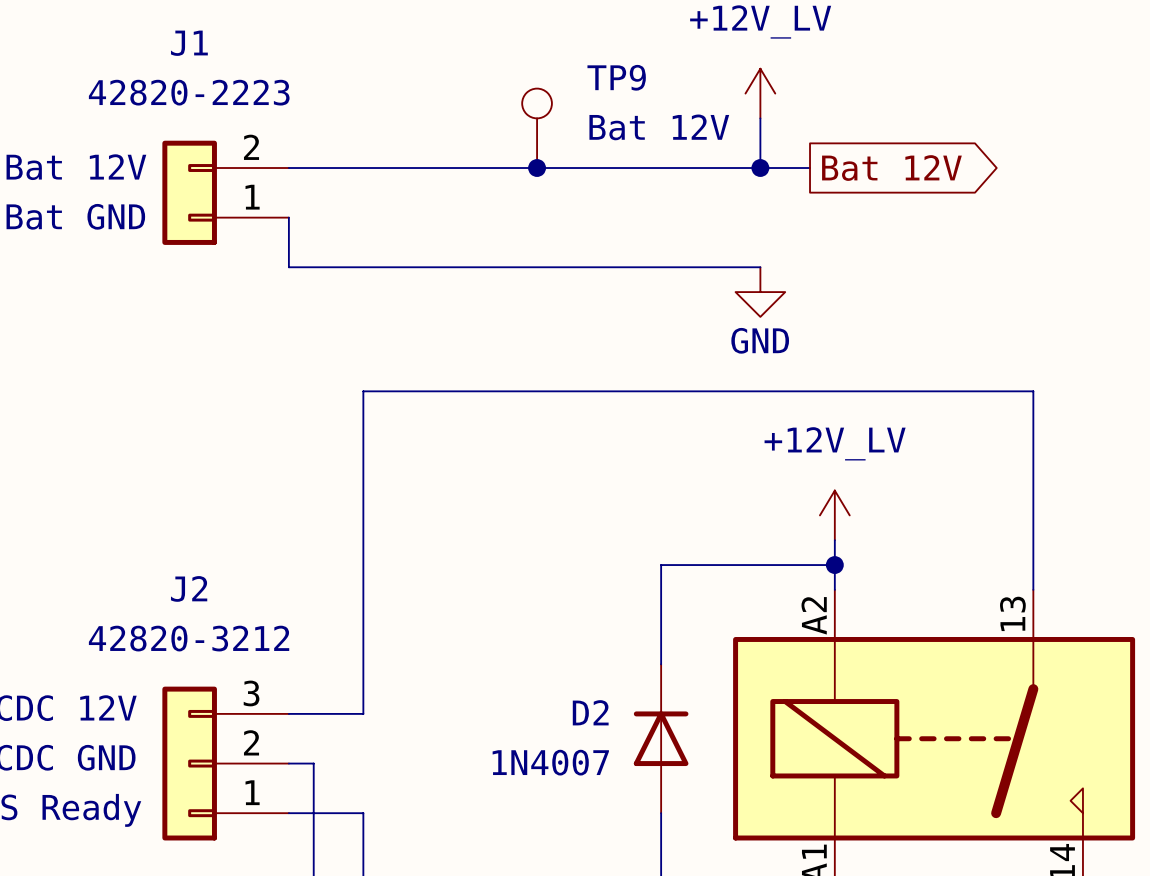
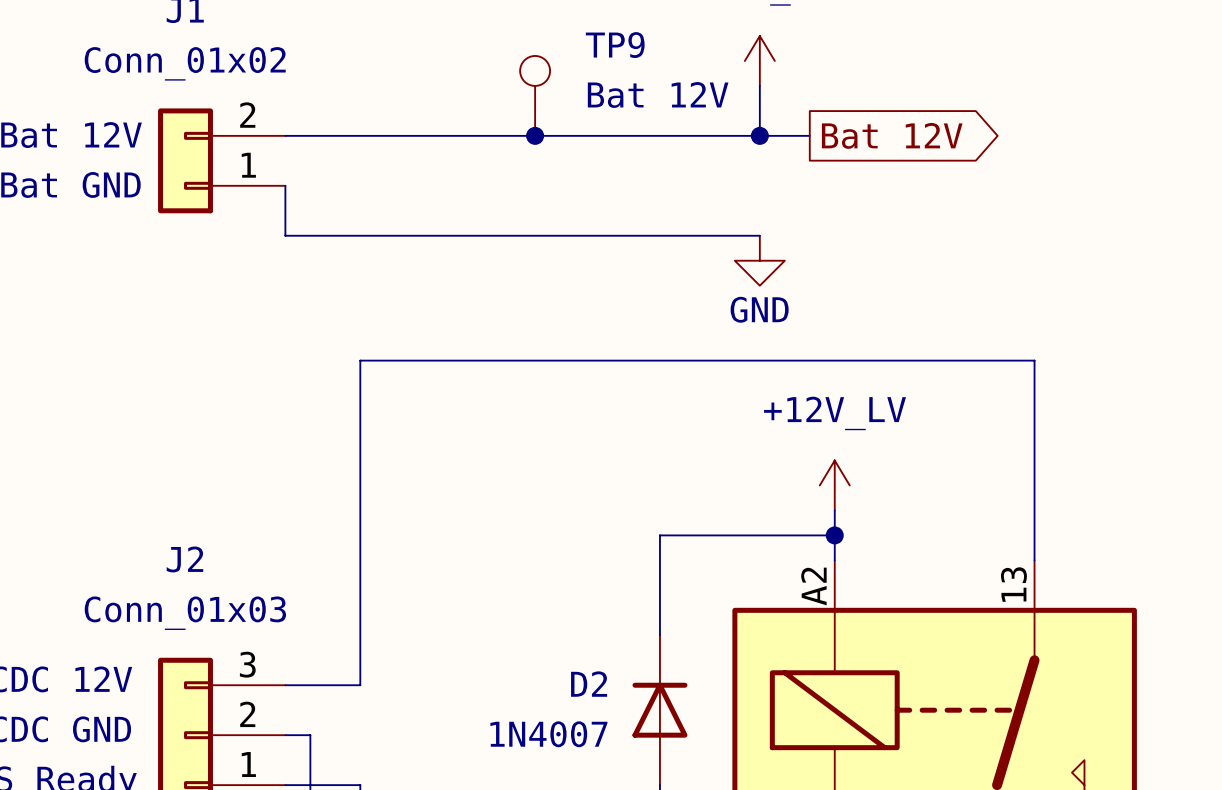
J1 value: 42820-2223 (189, 92) -> Conn_01x02 (185, 63)
J2 value: 42820-3212 (189, 638) -> Conn_01x03 (185, 613)

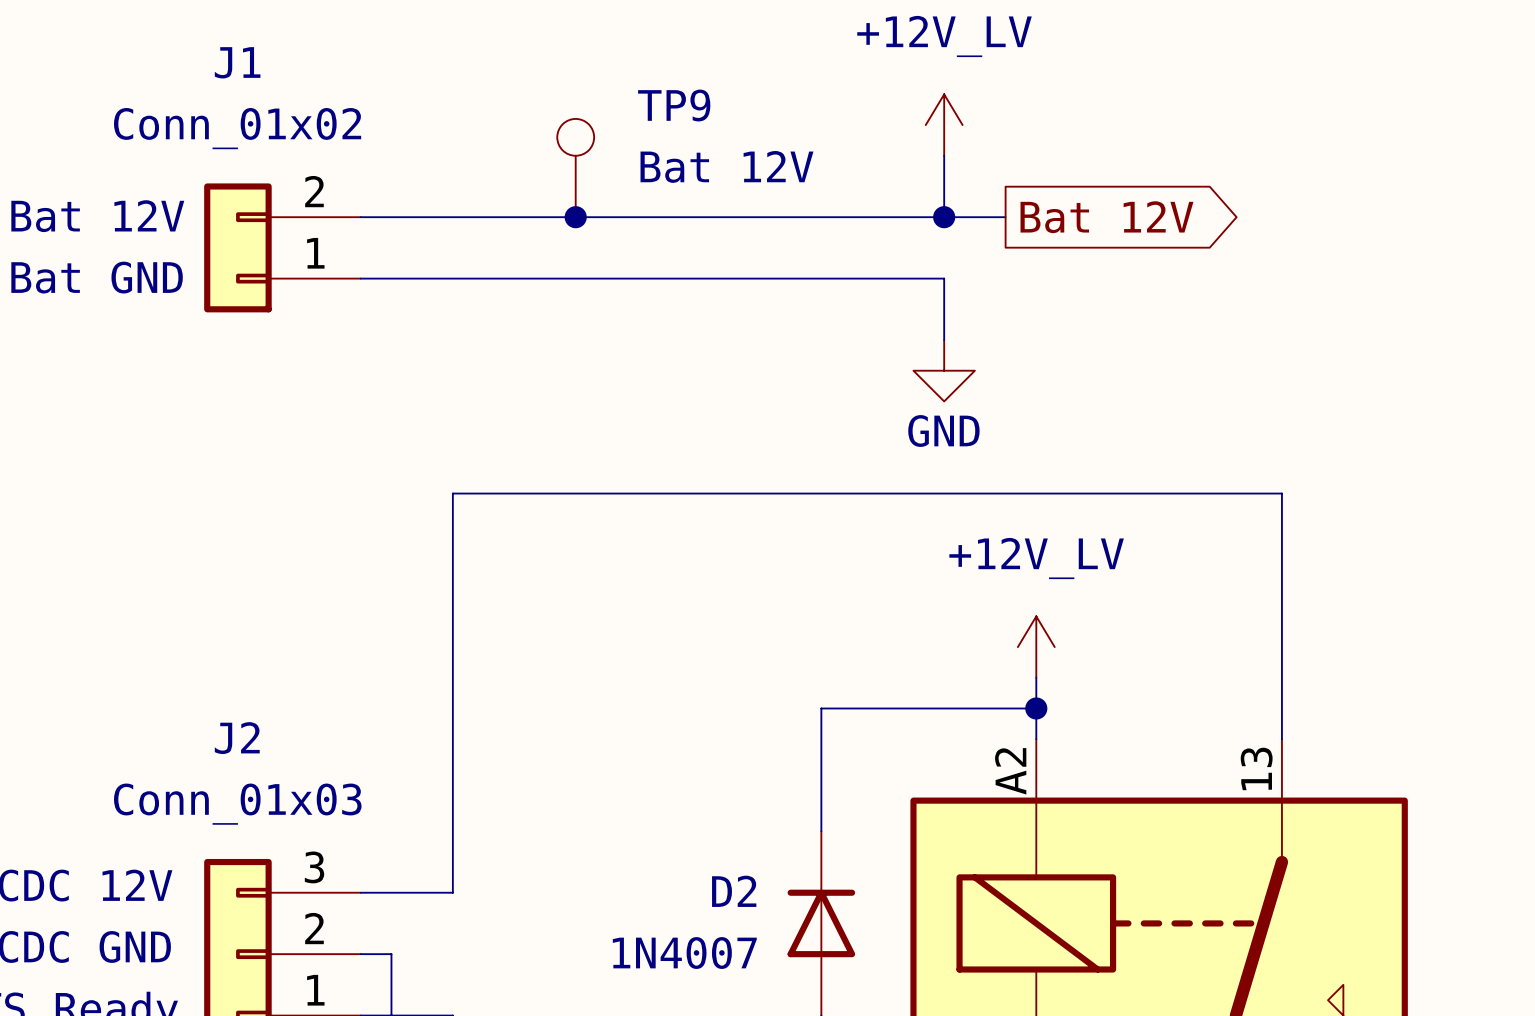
TP9 position: (535, 95) -> (575, 168)
junction position: (535, 135) -> (575, 217)
wire: (285, 185) (285, 235) (759, 235) -> (360, 278) (944, 278) (944, 340)

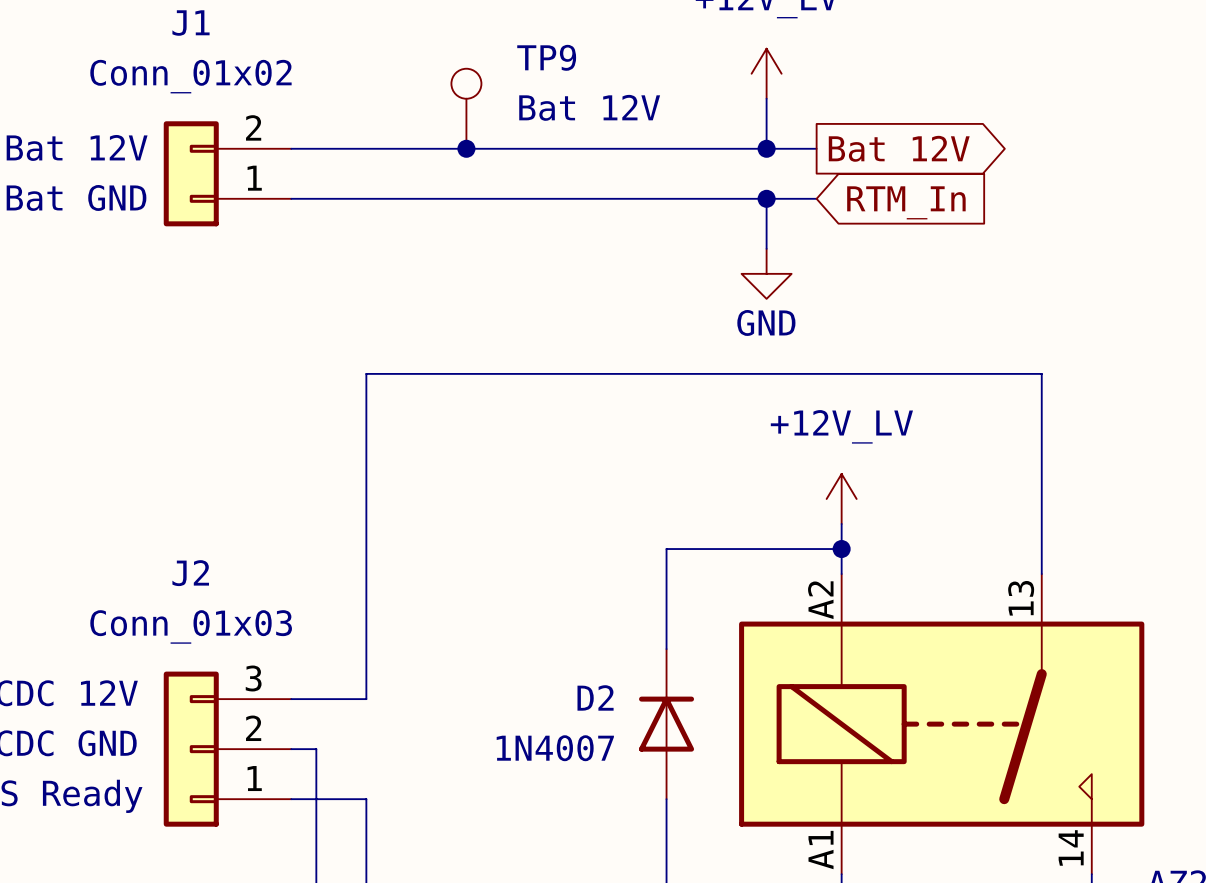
wire: none -> (766, 198) (816, 198)
junction: none -> (766, 198)
global label: none -> RTM_In (906, 202)

